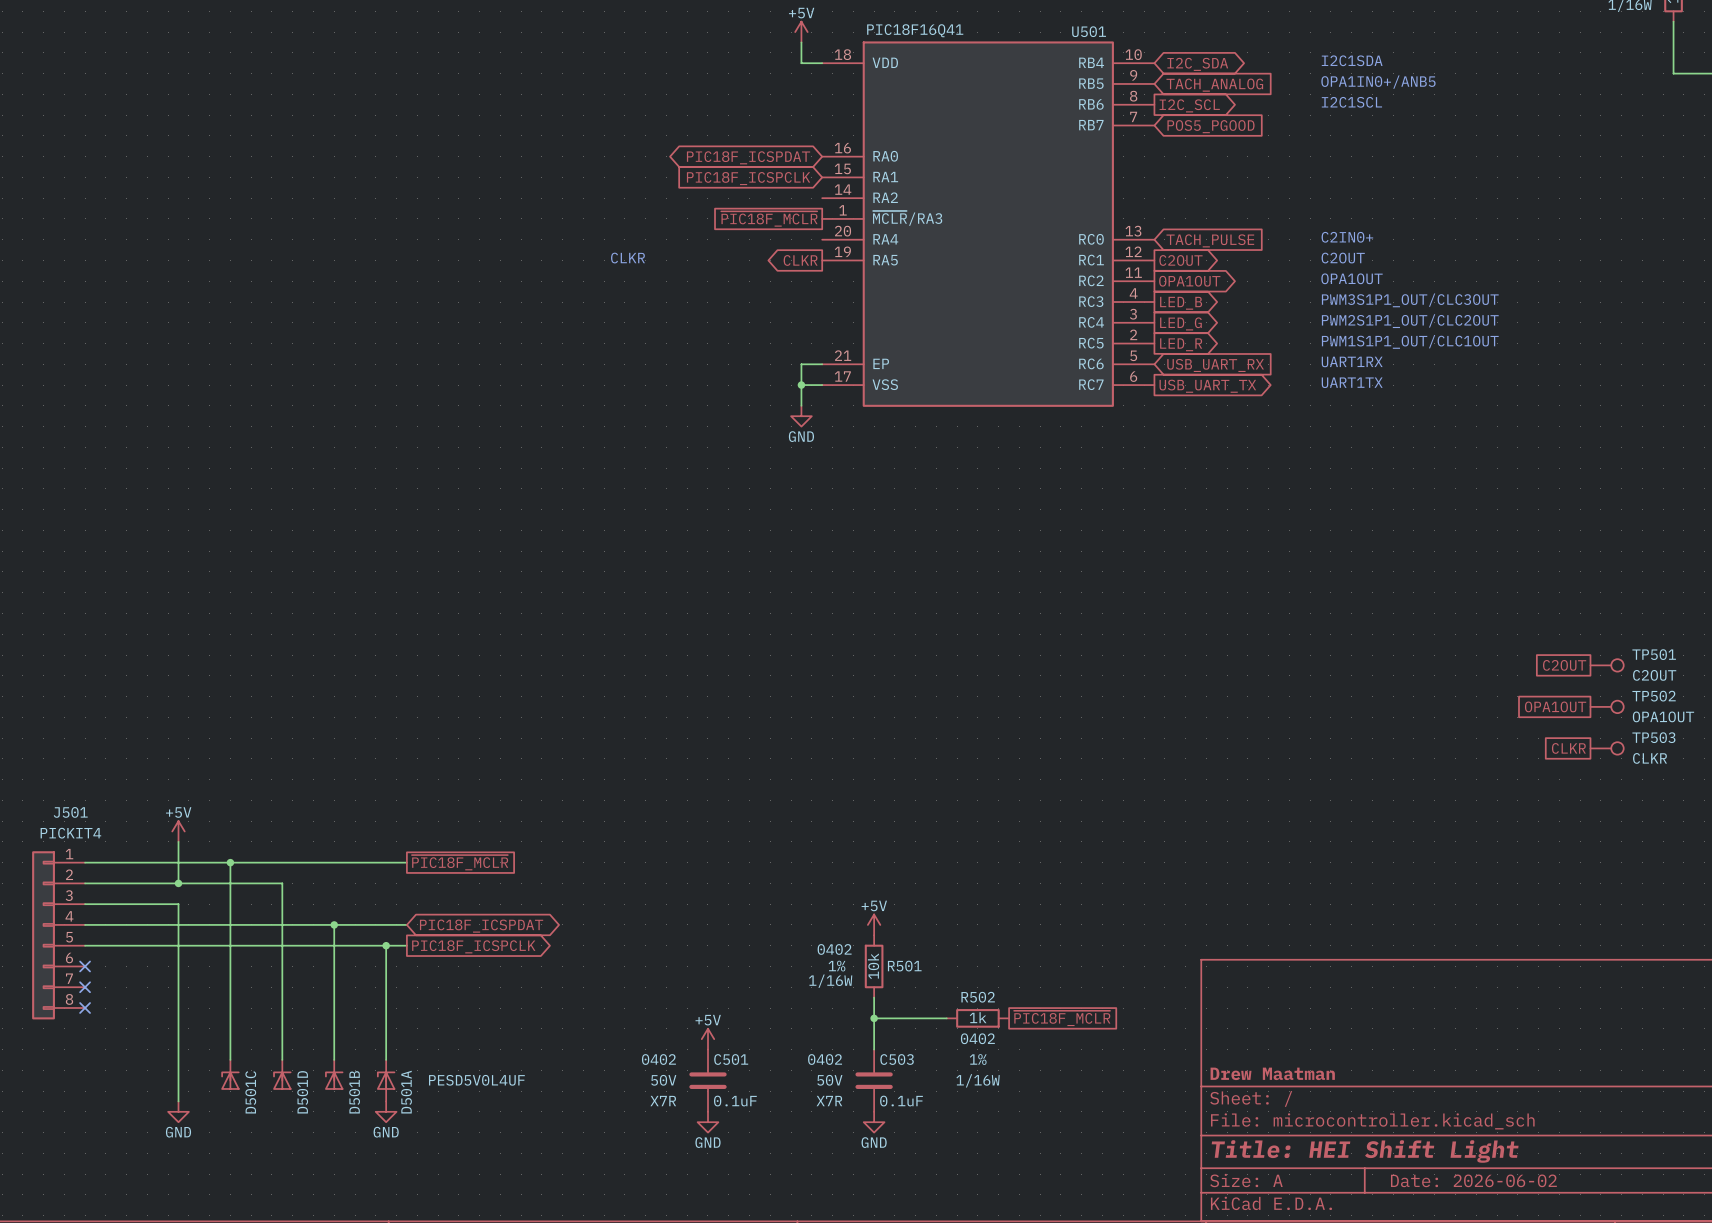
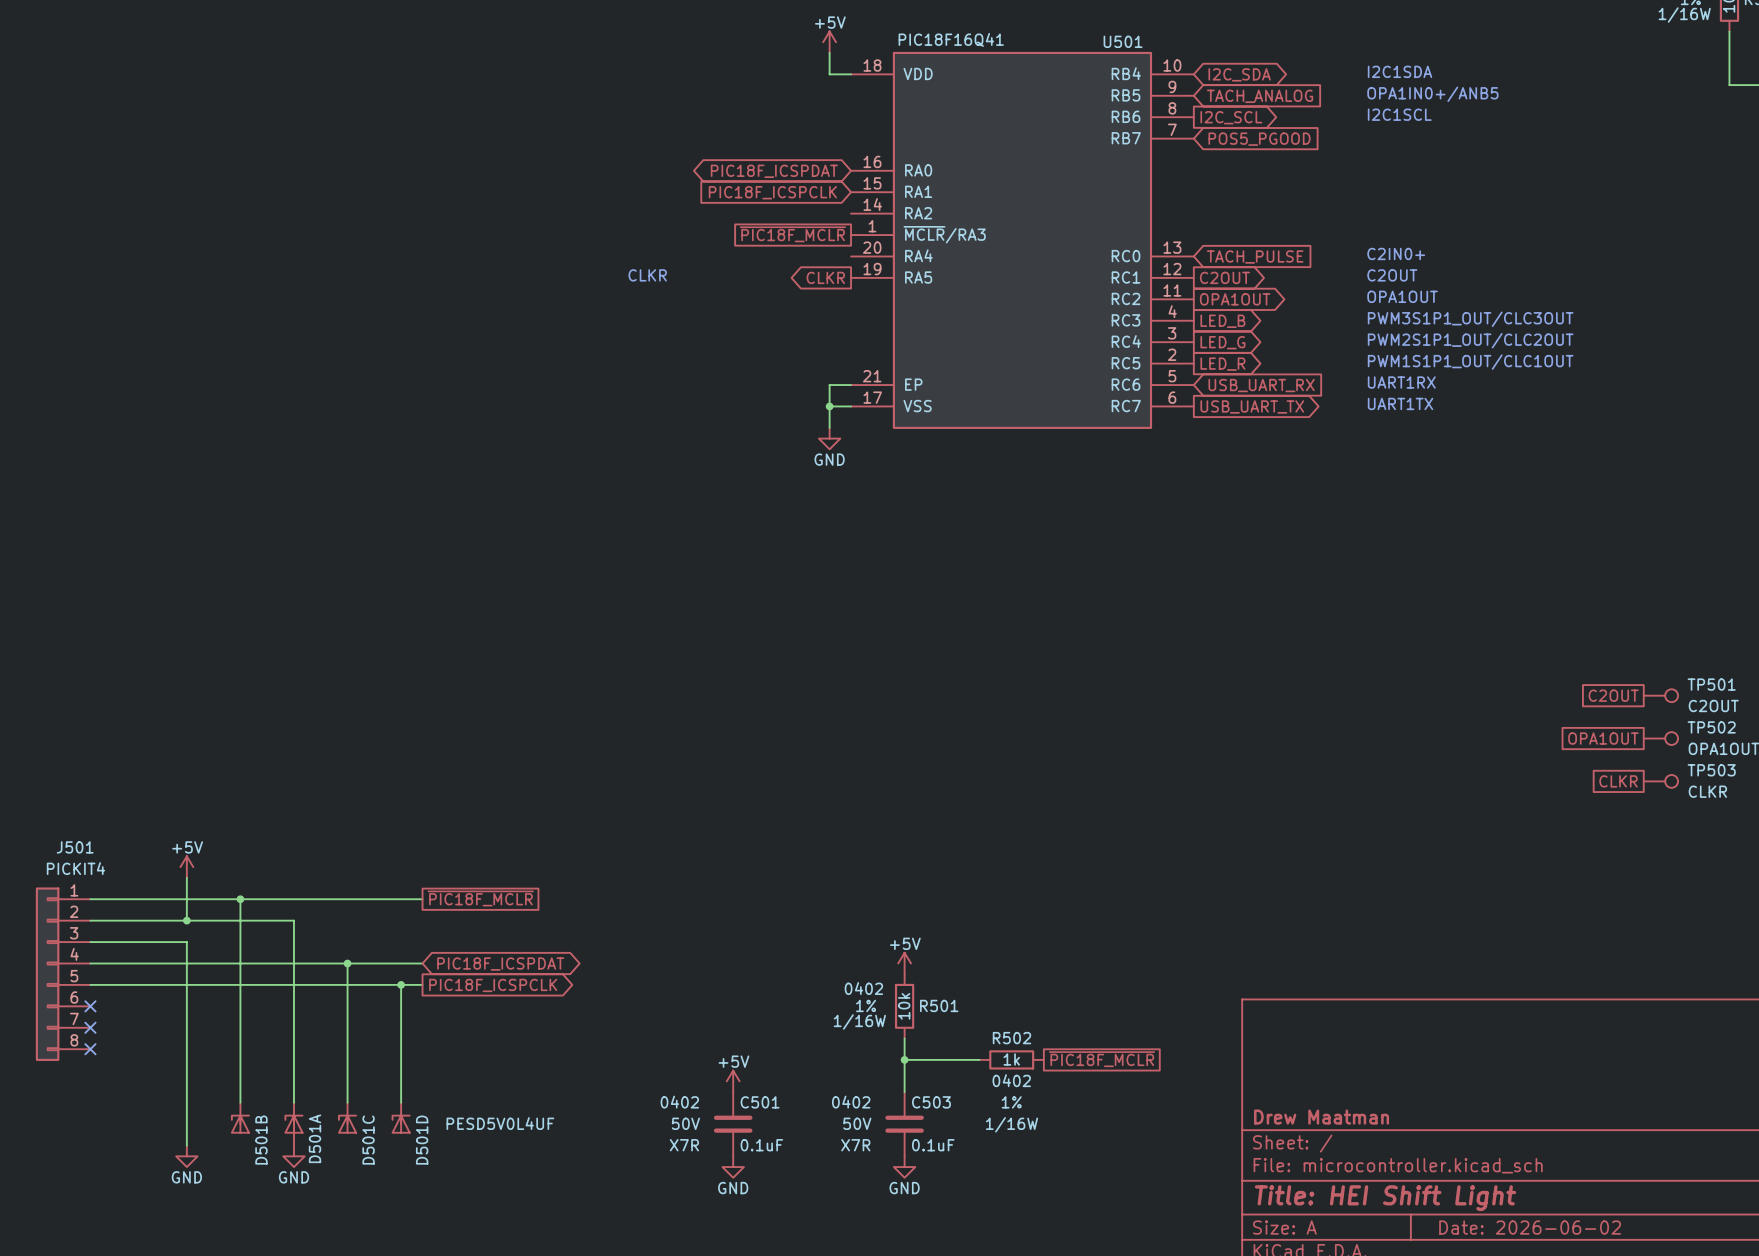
D501D position: (282, 1074) -> (401, 1117)
D501A position: (386, 1080) -> (293, 1124)
D501C name: D501C (250, 1092) -> D501B (261, 1140)
D501B name: D501B (354, 1092) -> D501C (368, 1140)
power symbol position: GND (386, 1111) -> GND (293, 1156)

